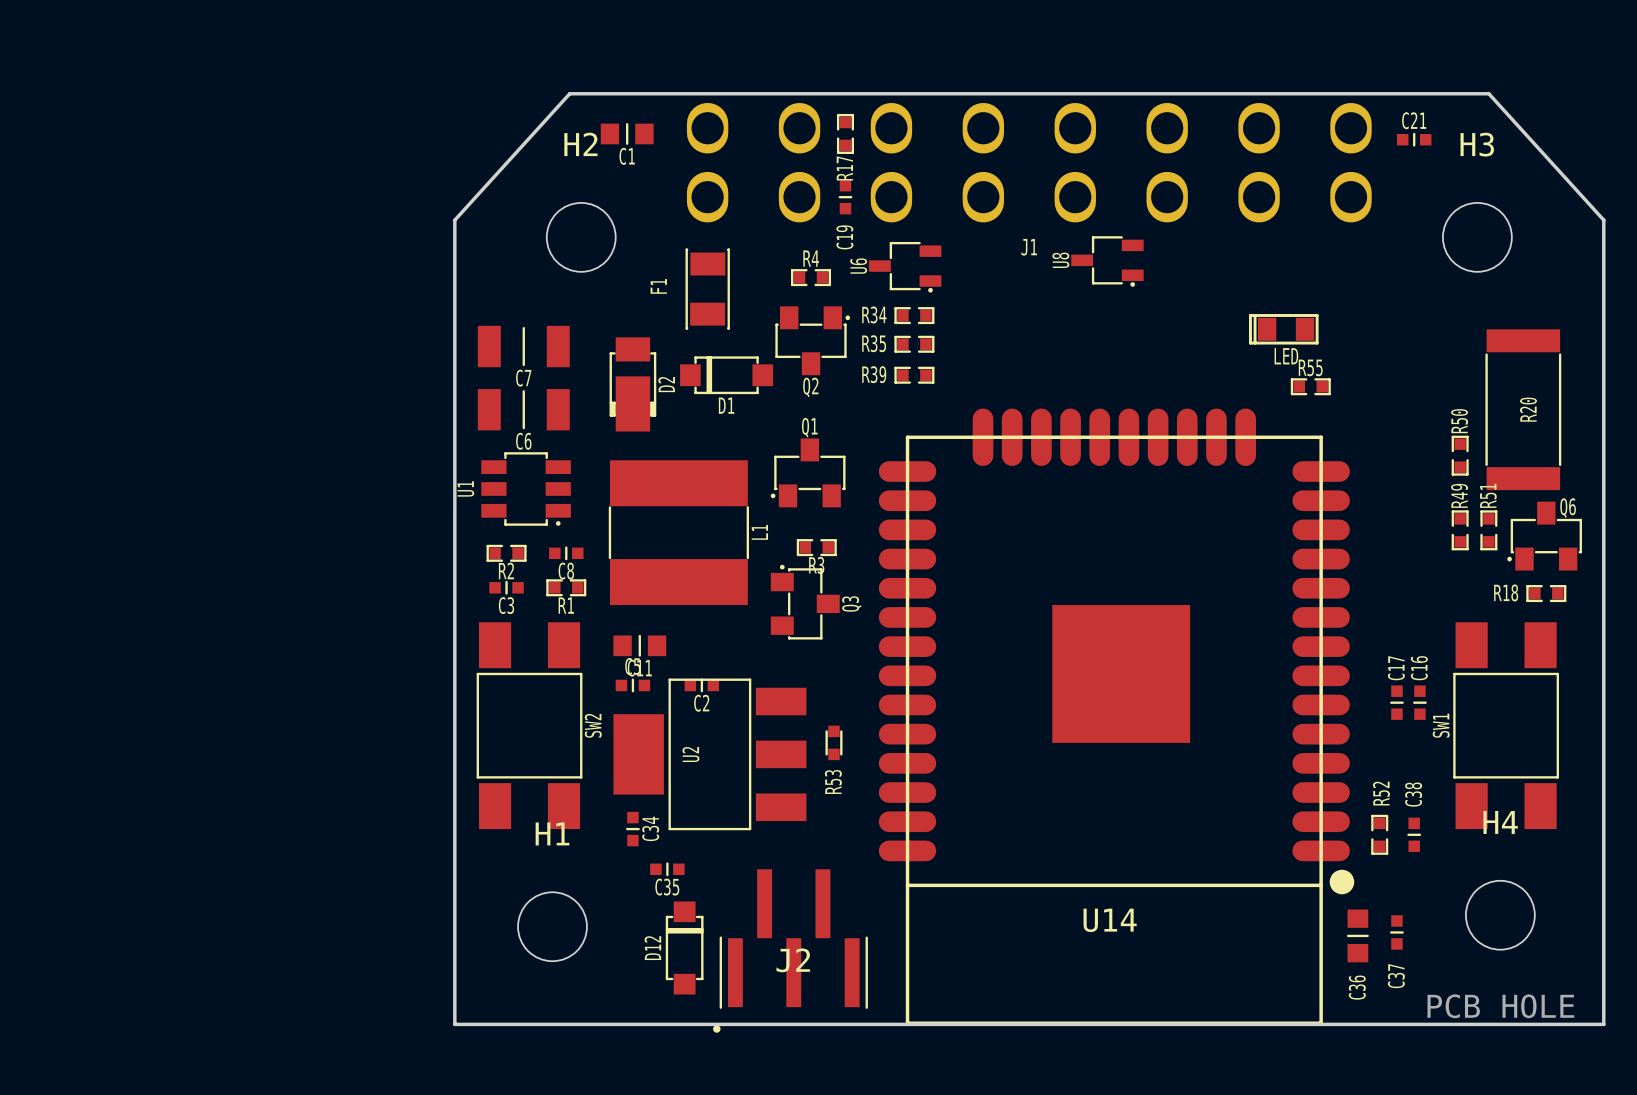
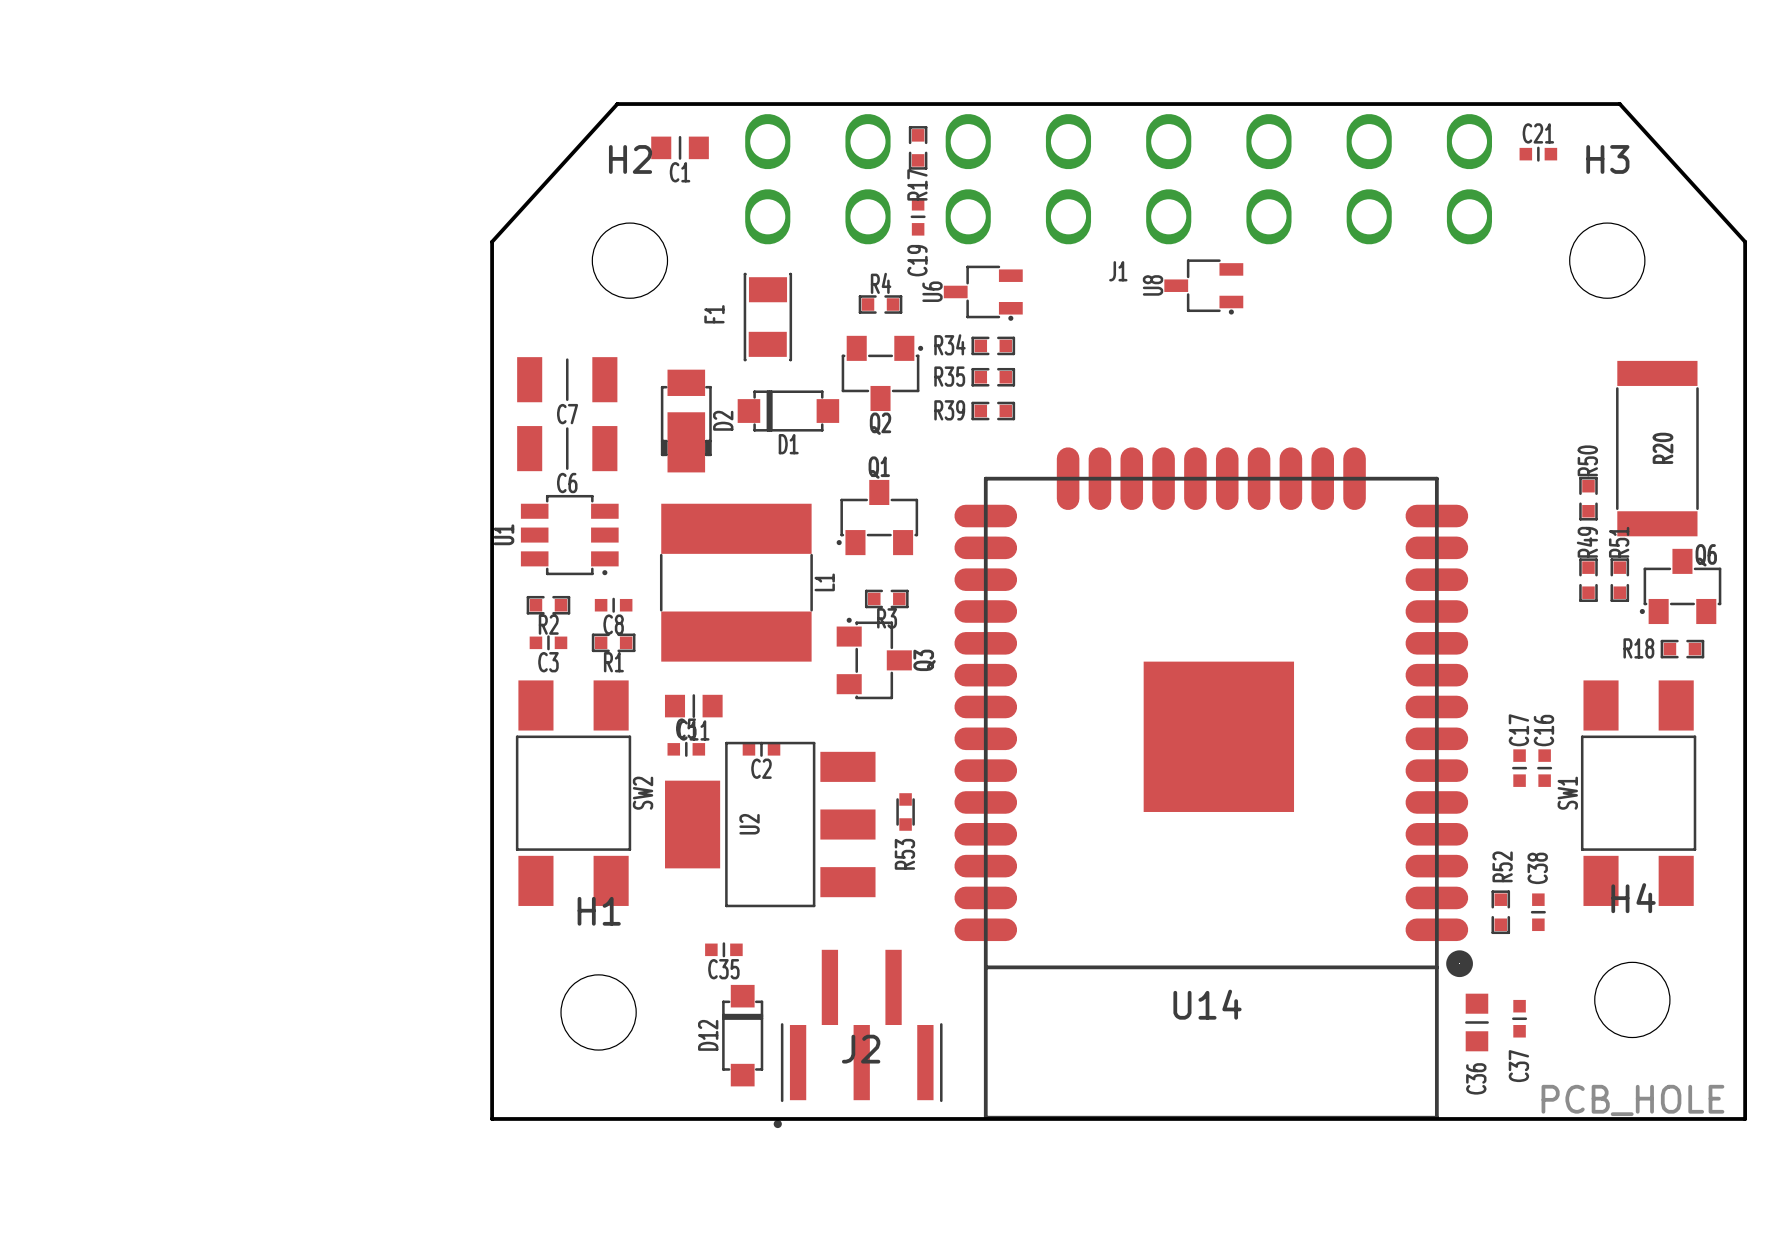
part: LED (1283, 329) -> none
R55: (1310, 386) -> none
C34: (632, 829) -> none

